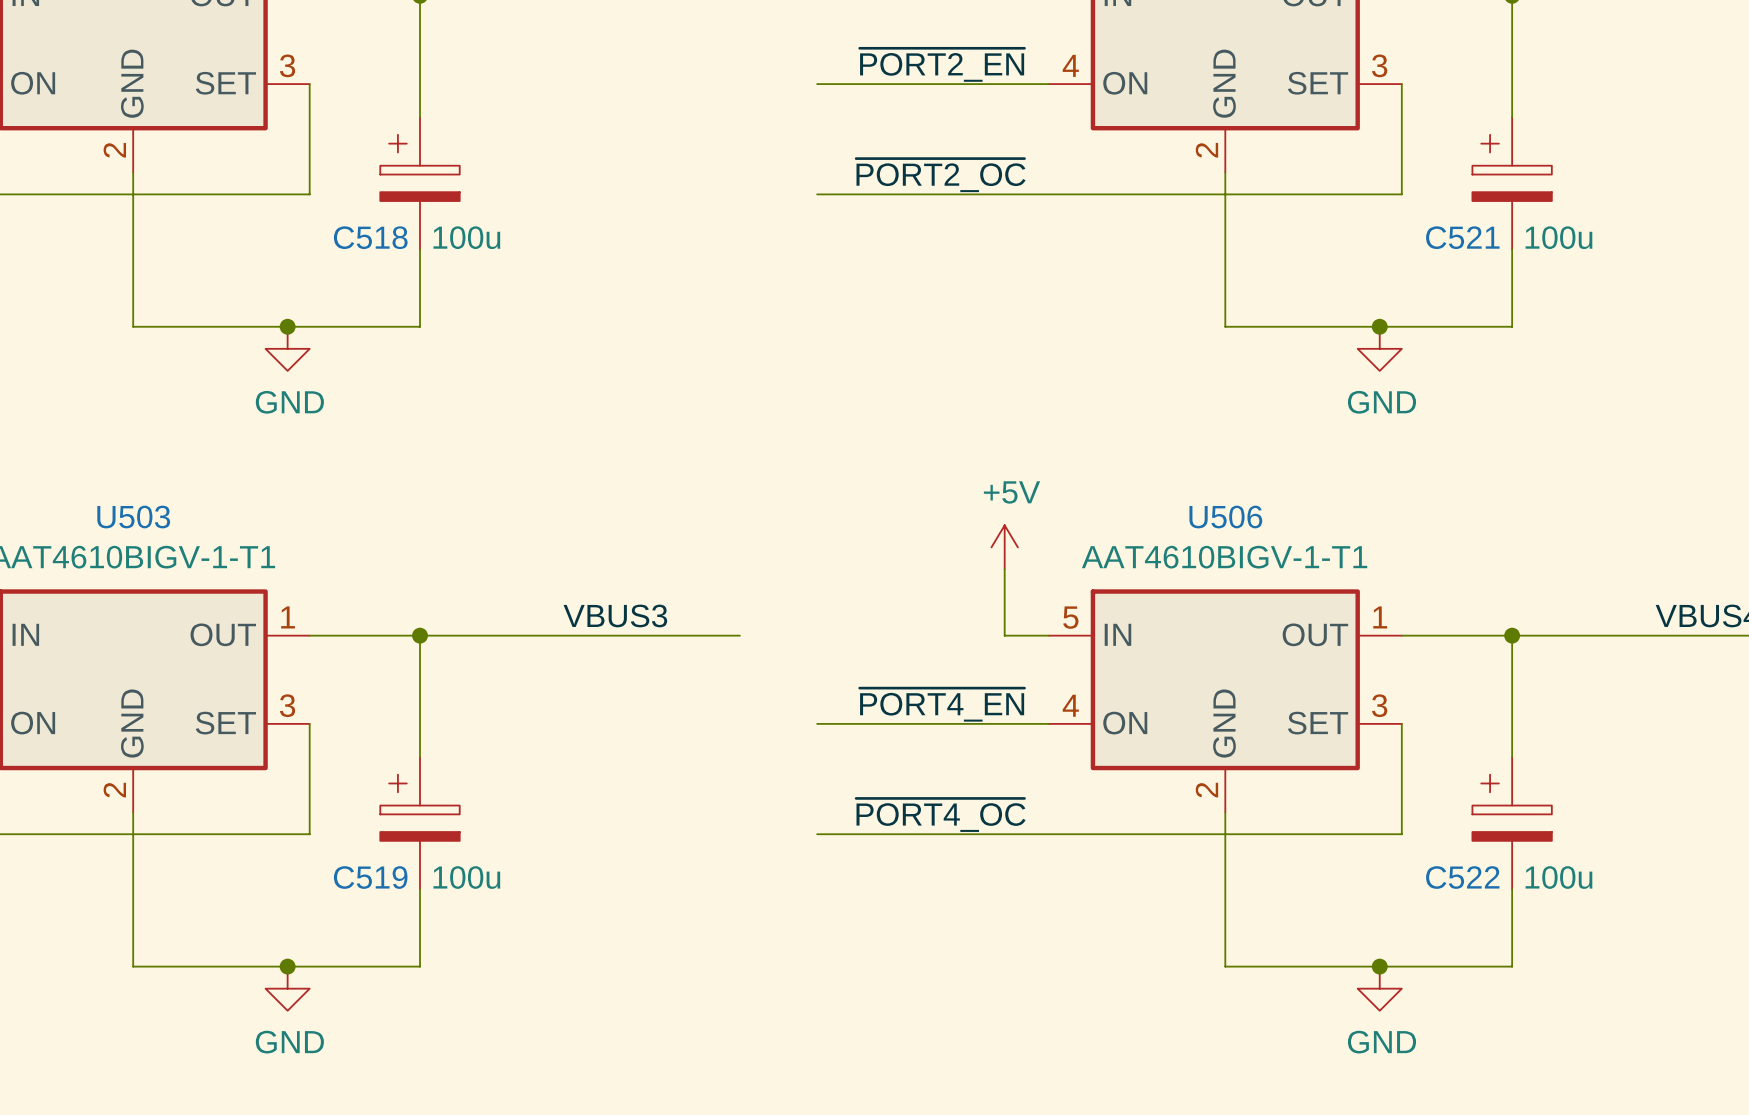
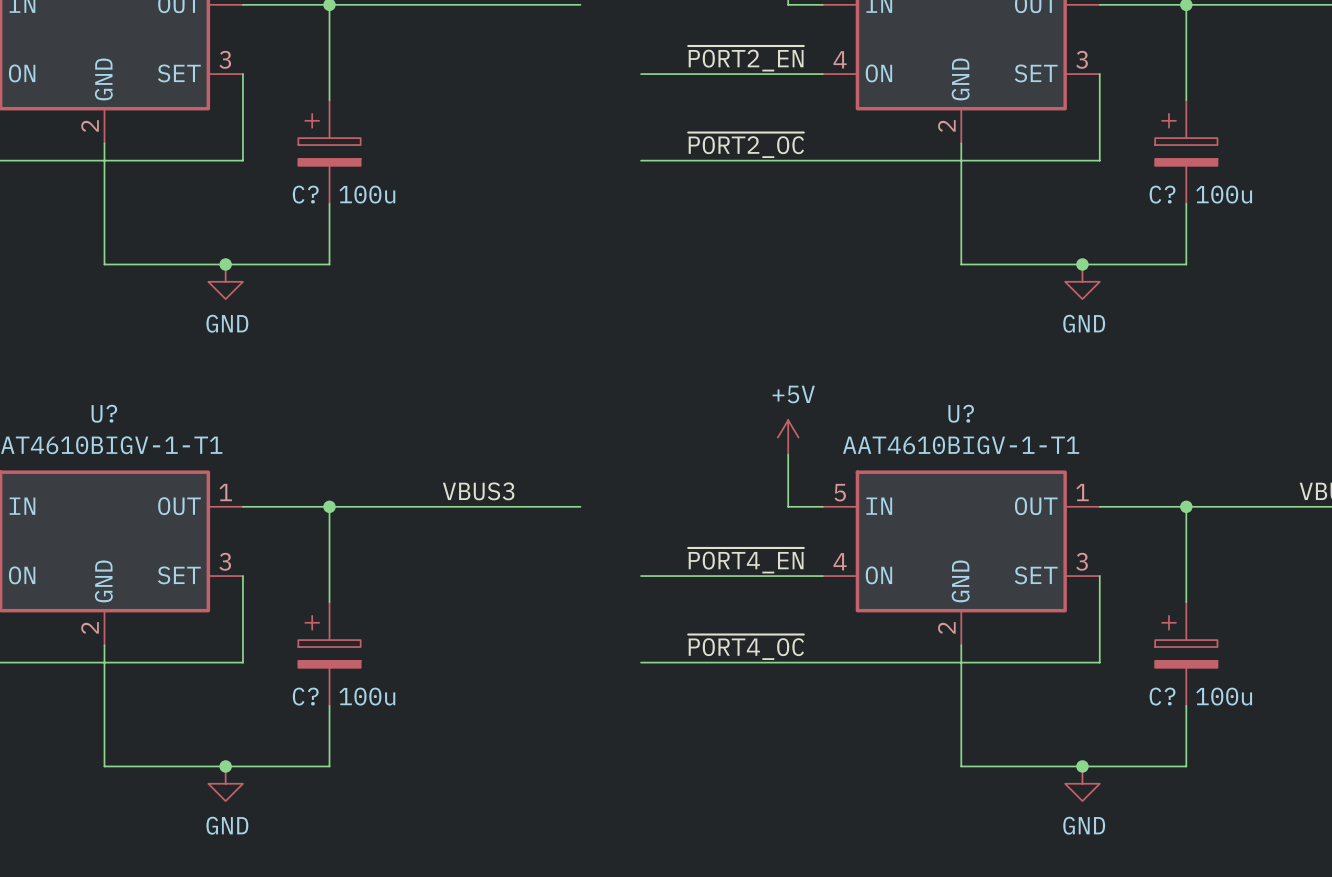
C518 name: C518 (370, 237) -> C? (305, 194)
C521 name: C521 (1462, 237) -> C? (1162, 194)
U503 name: U503 (133, 517) -> U? (104, 413)
U506 name: U506 (1225, 517) -> U? (961, 413)
C519 name: C519 (370, 877) -> C? (305, 696)
C522 name: C522 (1462, 877) -> C? (1162, 696)

